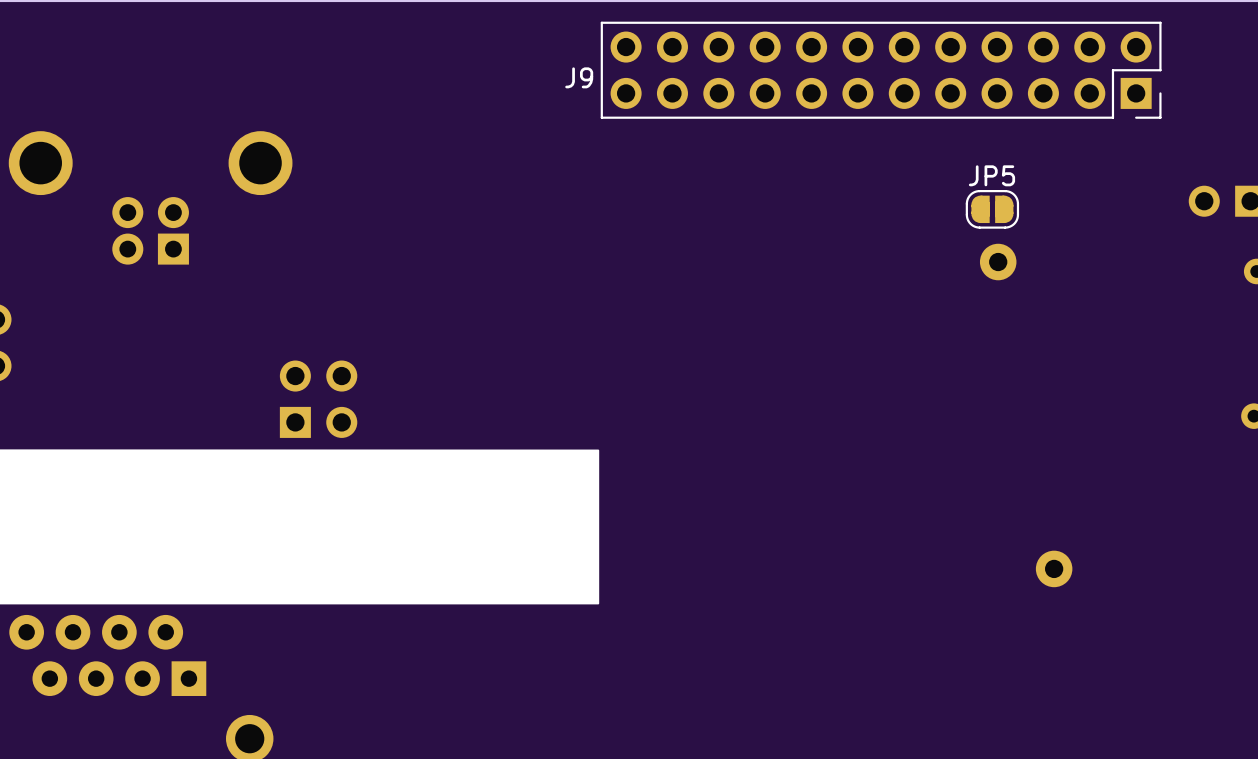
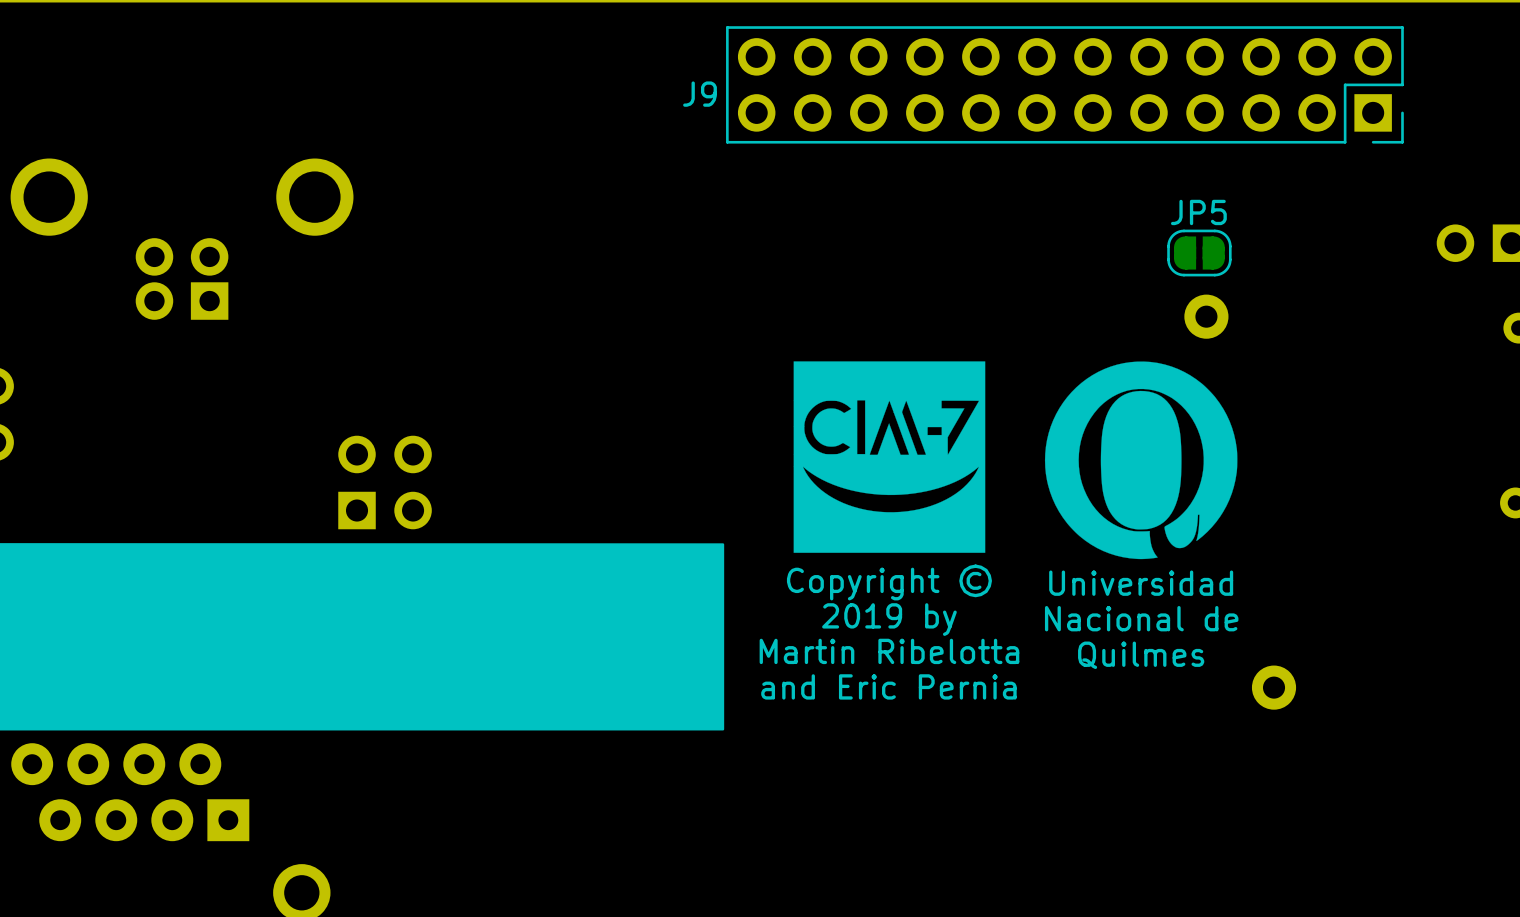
drawing: none -> [793, 361, 986, 553]
drawing: none -> [1044, 361, 1238, 560]
text: none -> Copyright © (889, 582)
text: none -> Universidad (1141, 583)
text: none -> Nacional de (1141, 618)
text: none -> 2019 by (889, 619)
text: none -> Martin Ribelotta (889, 651)
text: none -> Quilmes (1141, 655)
text: none -> and Eric Pernia (888, 686)

